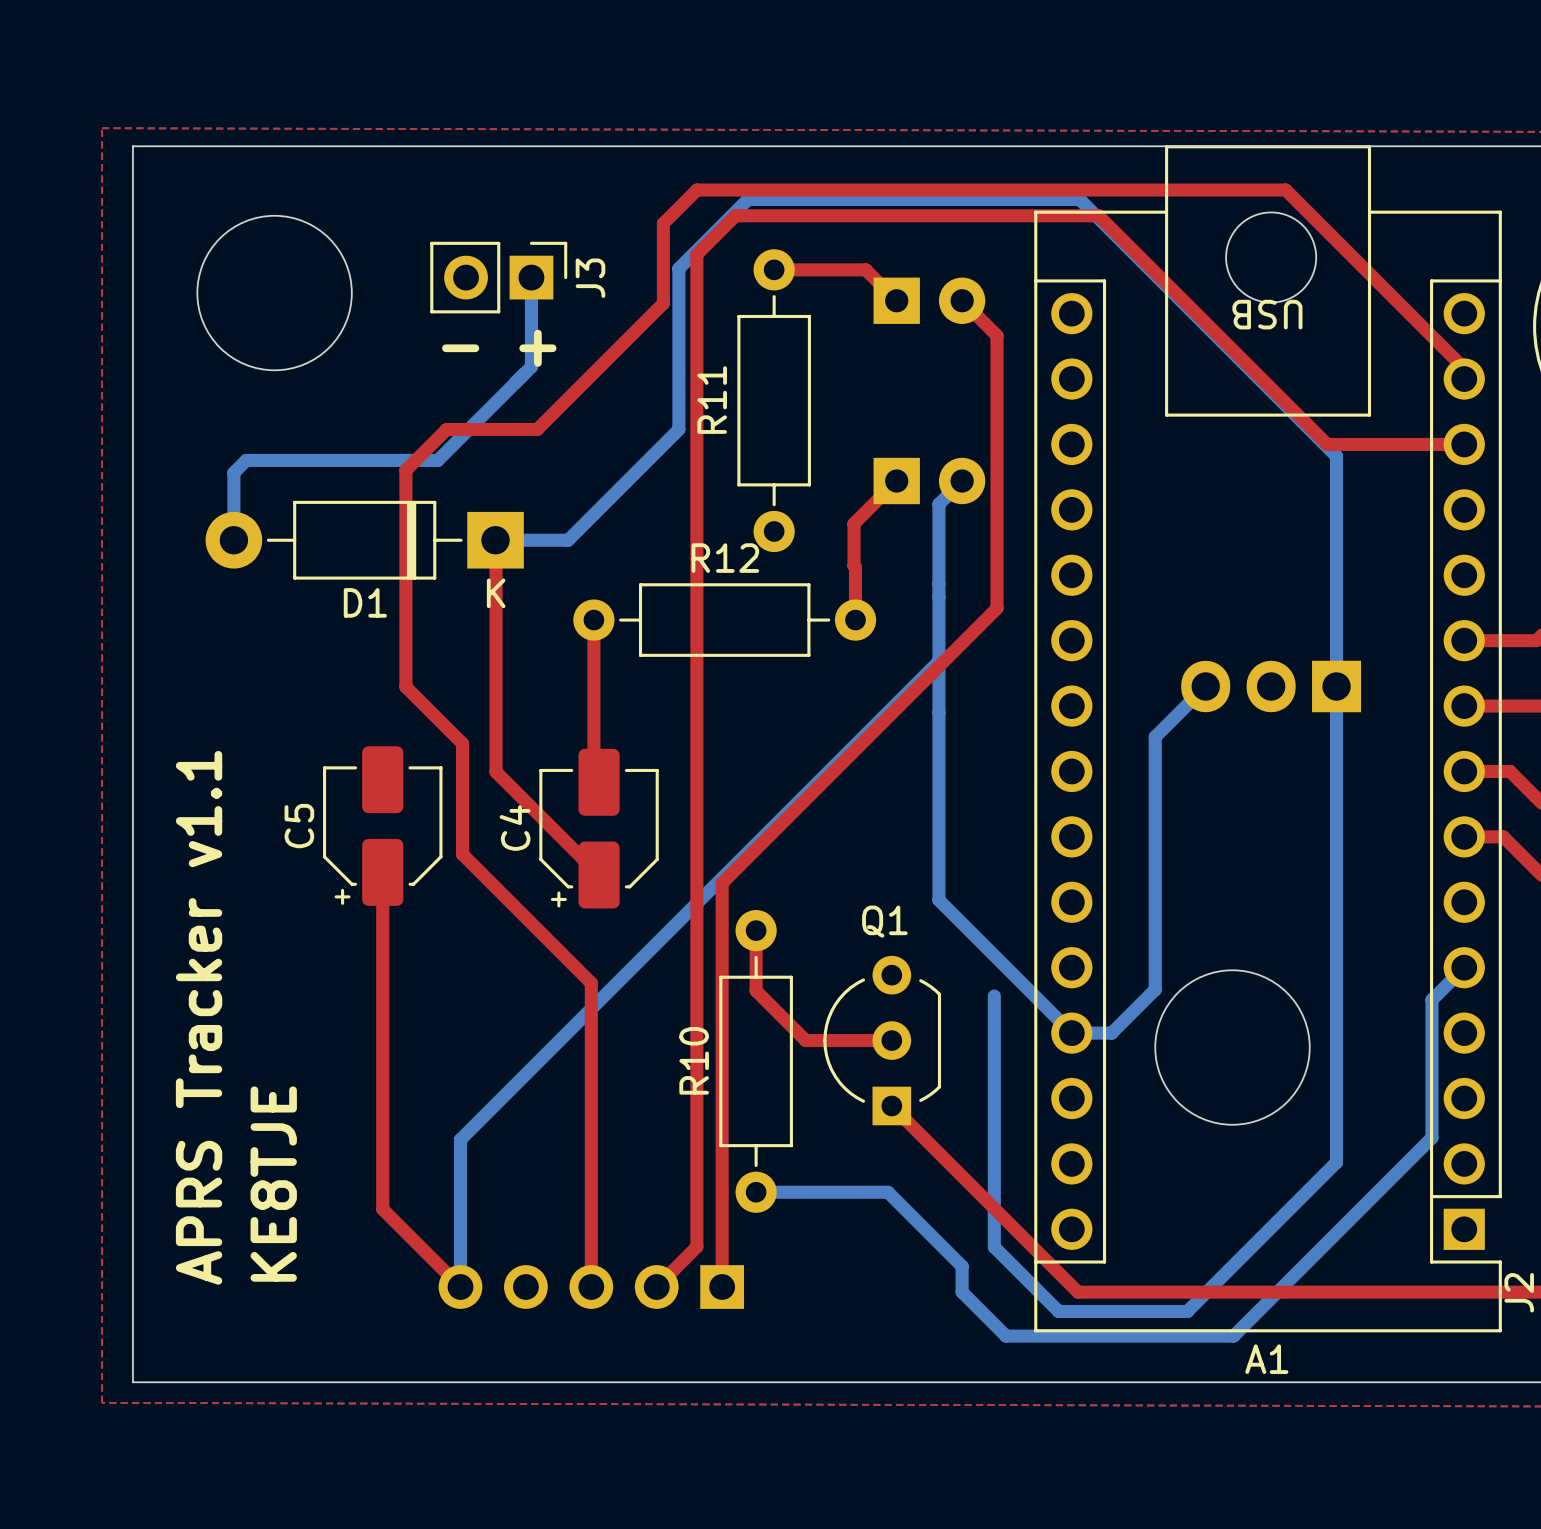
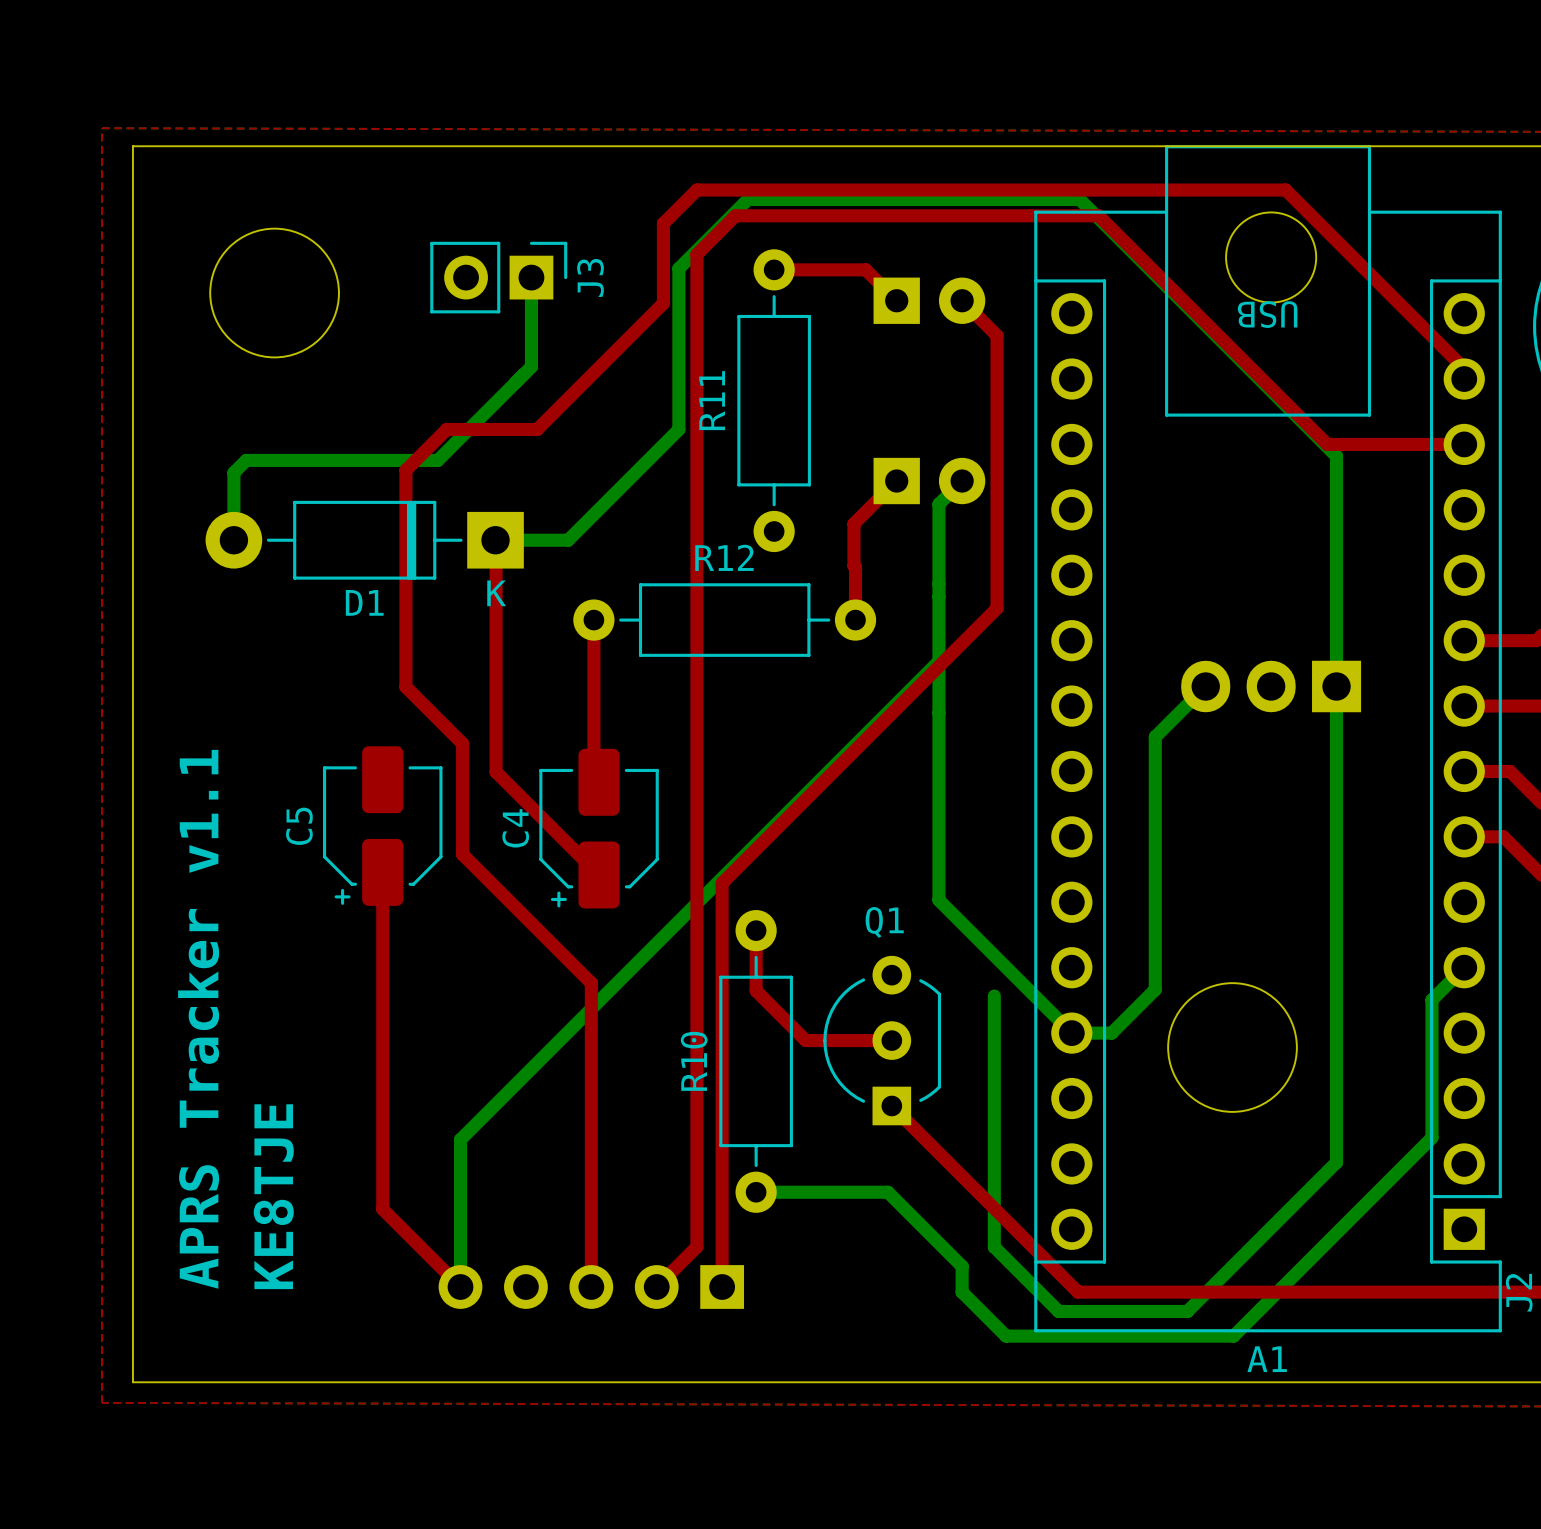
round board edge size: [196, 215, 353, 371] -> [209, 228, 340, 359]
text: - + (499, 348) -> none
round board edge size: [1154, 969, 1311, 1126] -> [1167, 982, 1298, 1113]

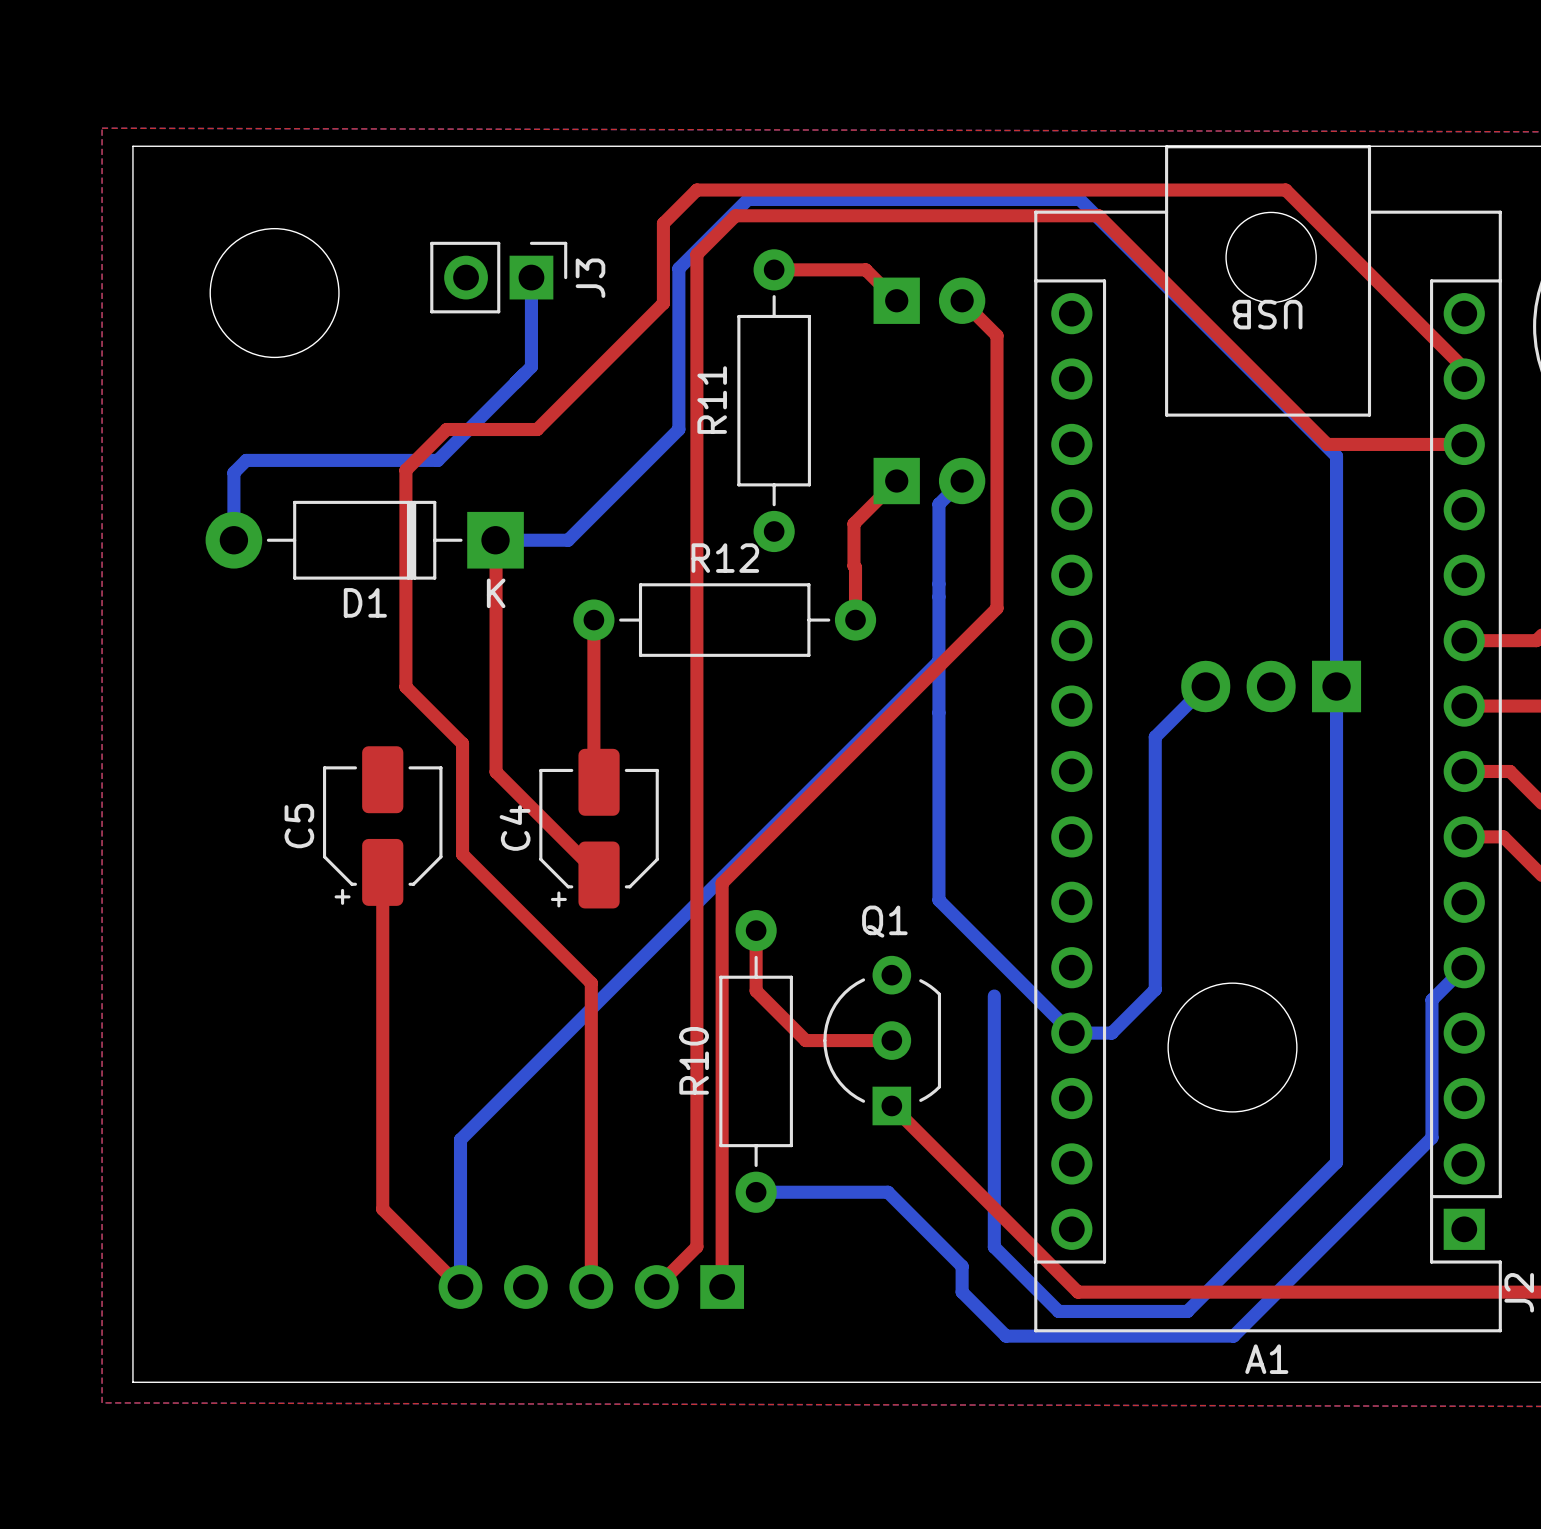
text: APRS Tracker v1.1 (198, 1019) -> none
text: KE8TJE (273, 1196) -> none

